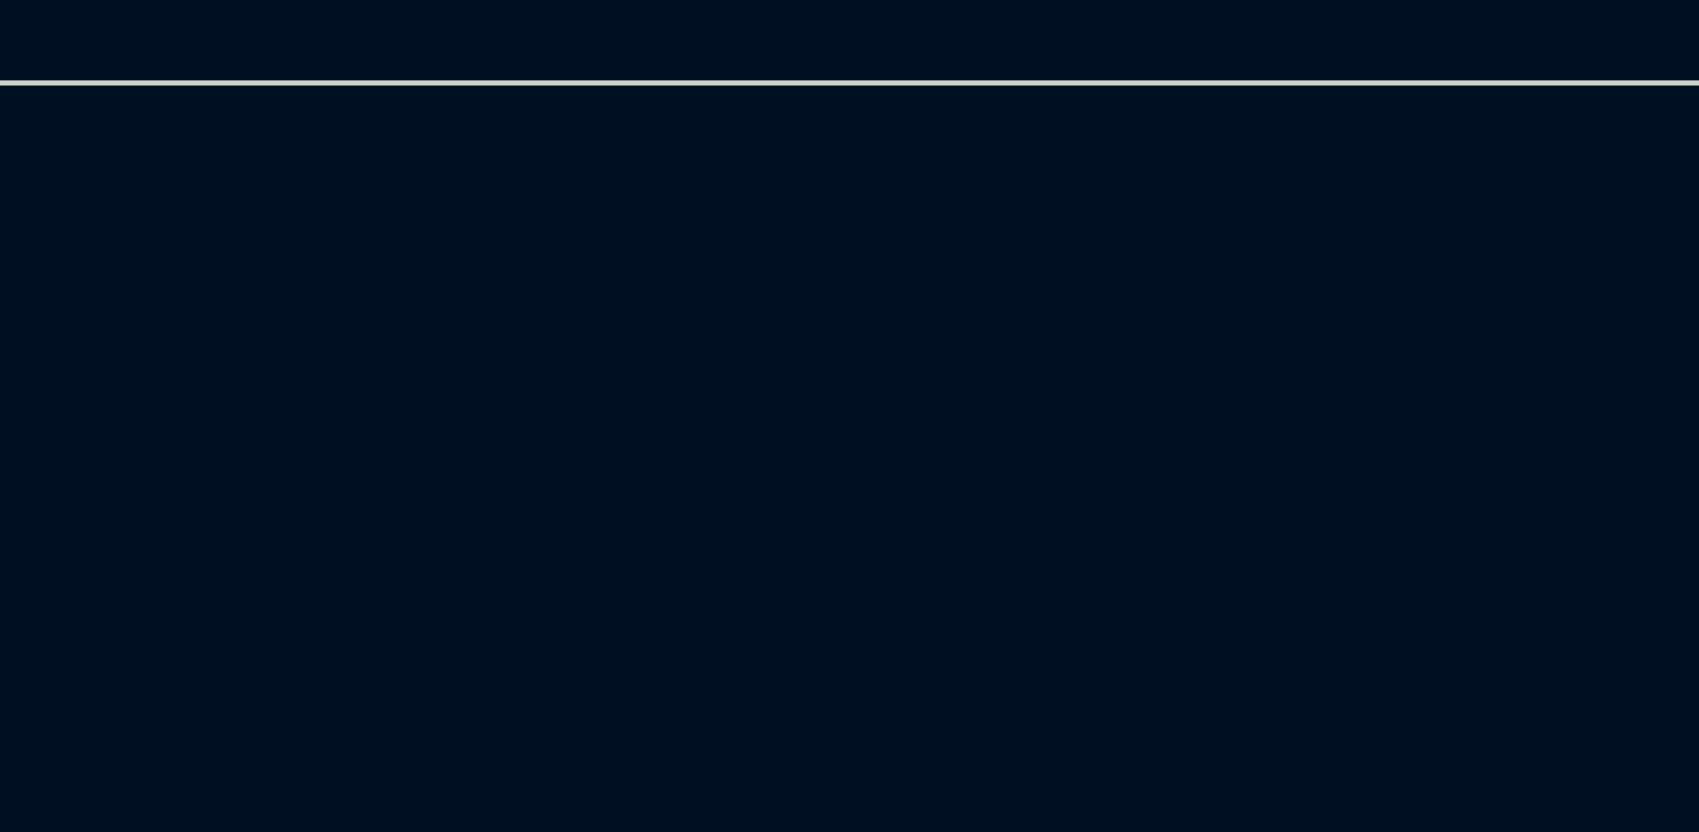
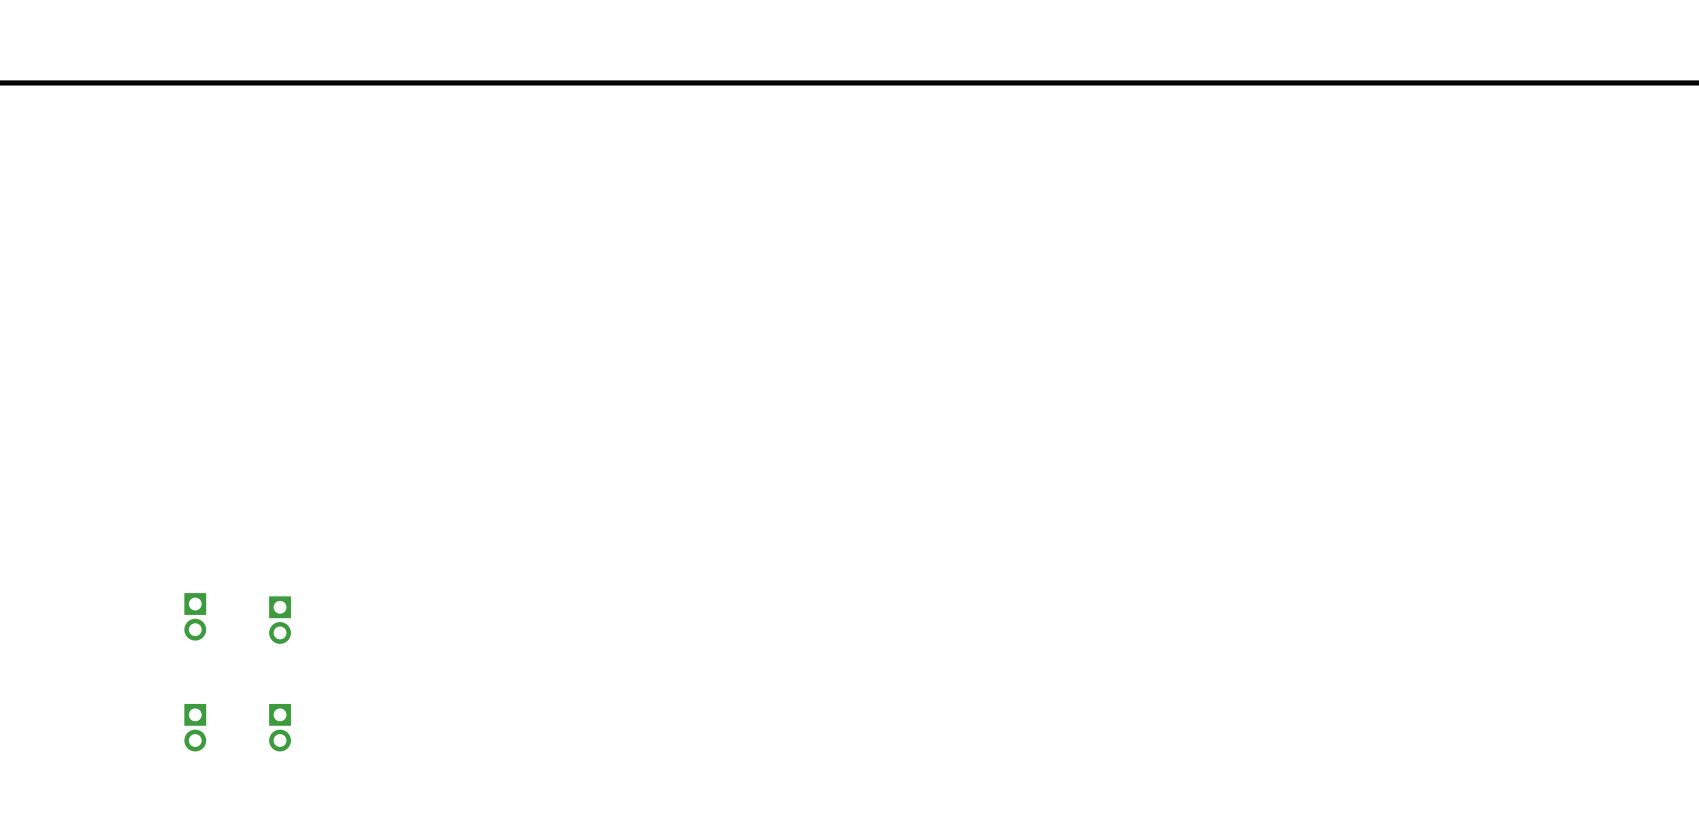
part: none -> (195, 616)
part: none -> (280, 620)
part: none -> (195, 727)
part: none -> (280, 727)

